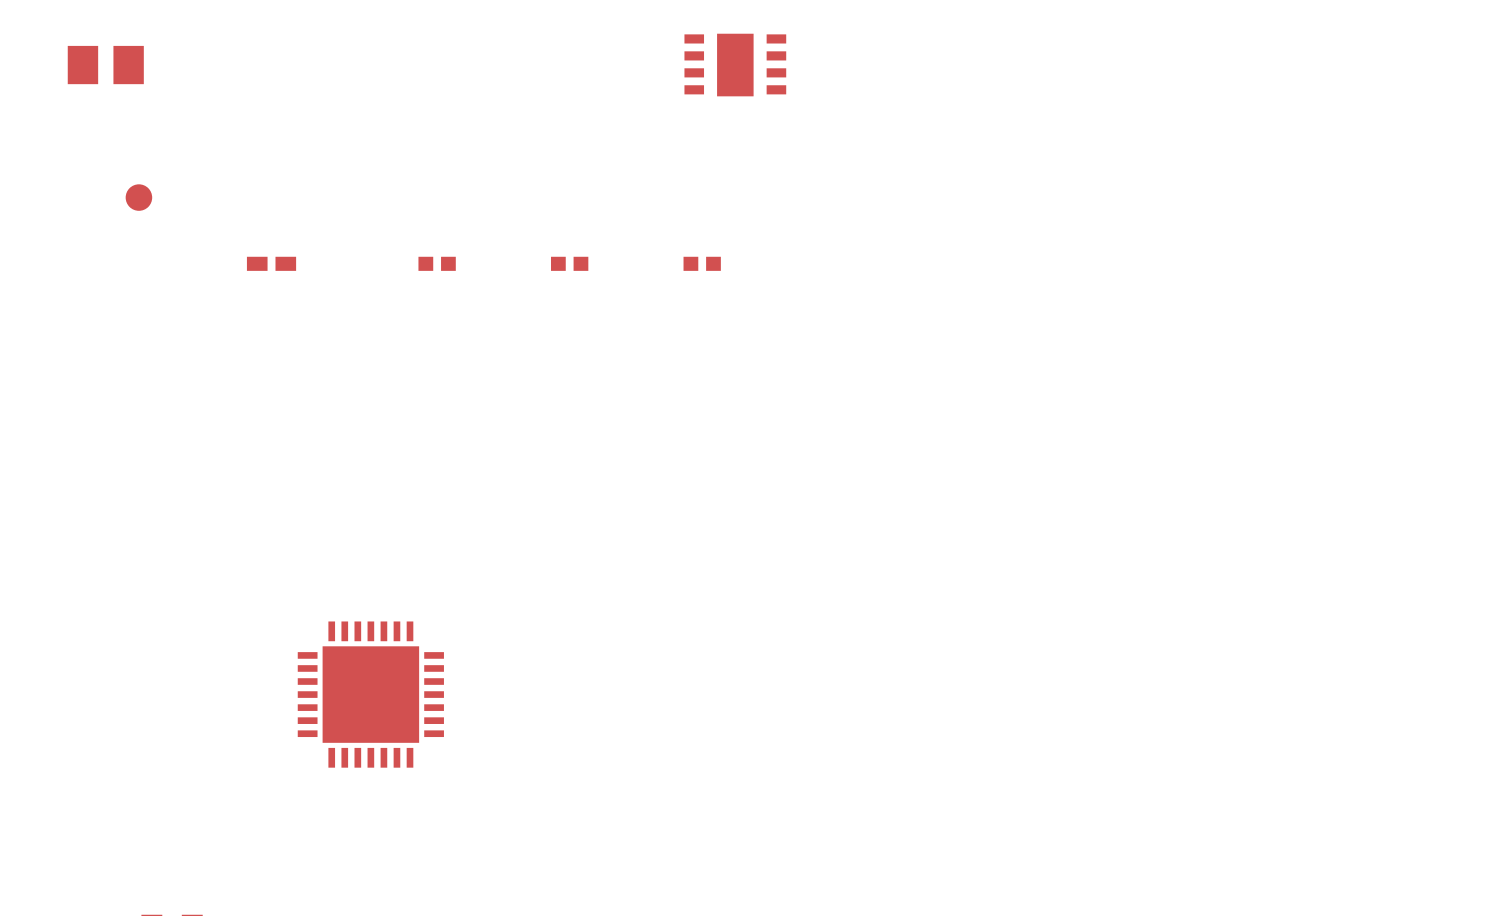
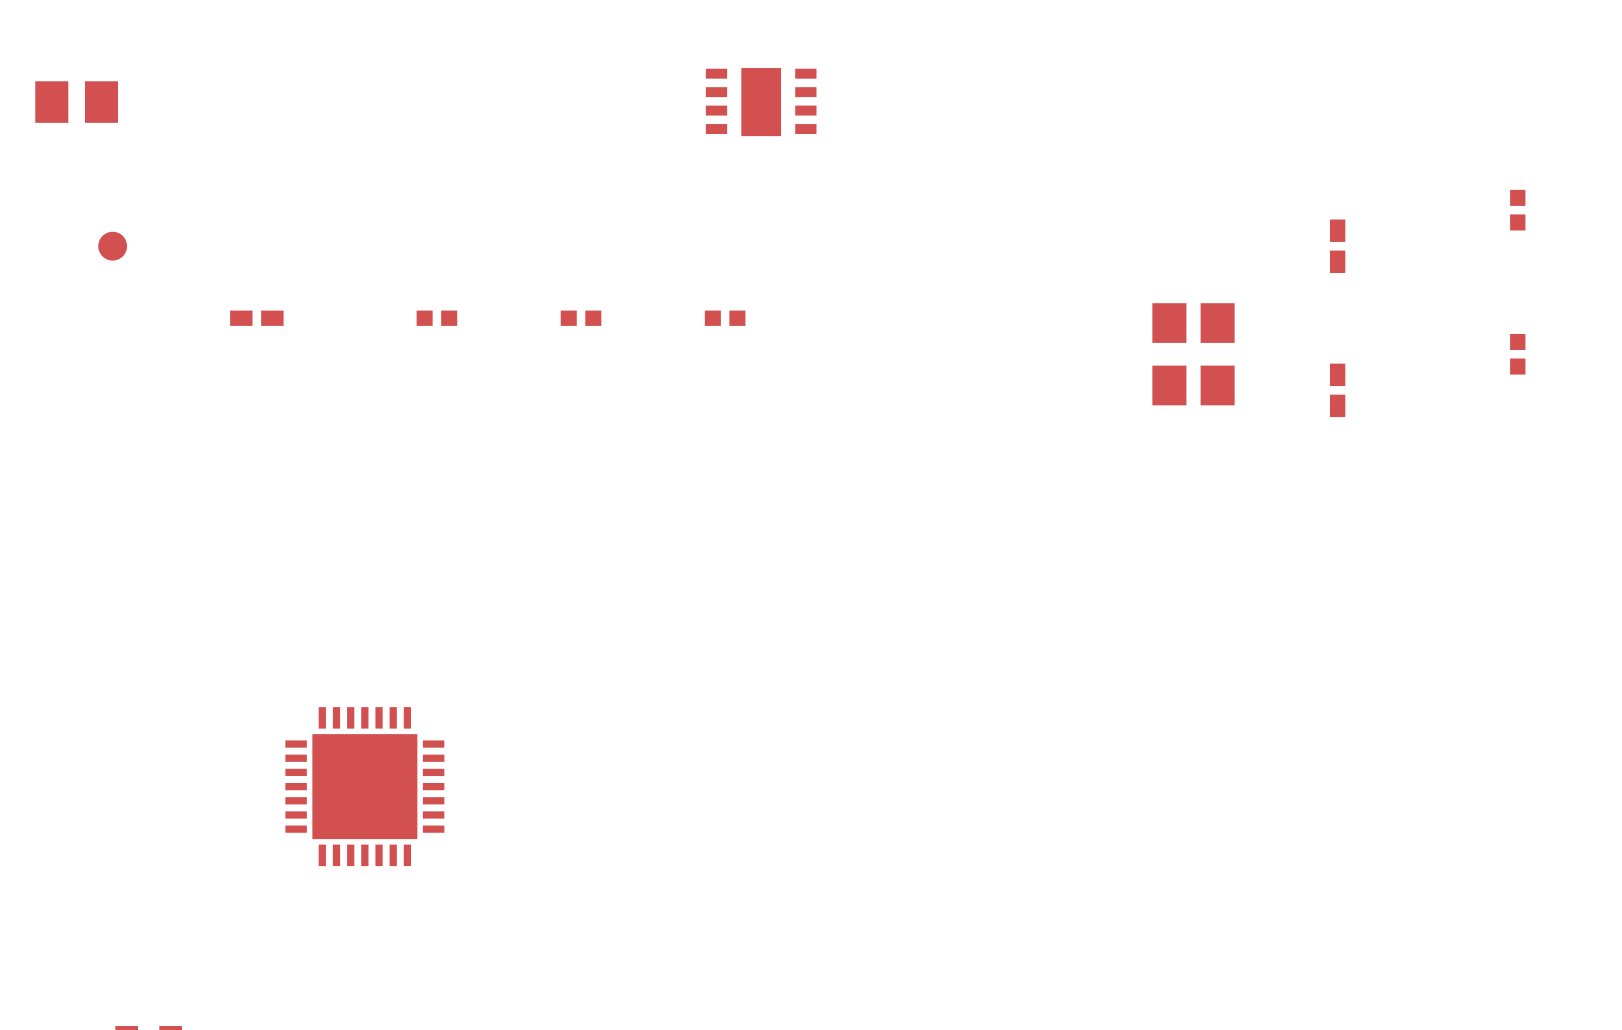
part: none -> (1517, 210)
part: none -> (1337, 246)
part: none -> (1193, 354)
part: none -> (1517, 354)
part: none -> (1337, 390)

